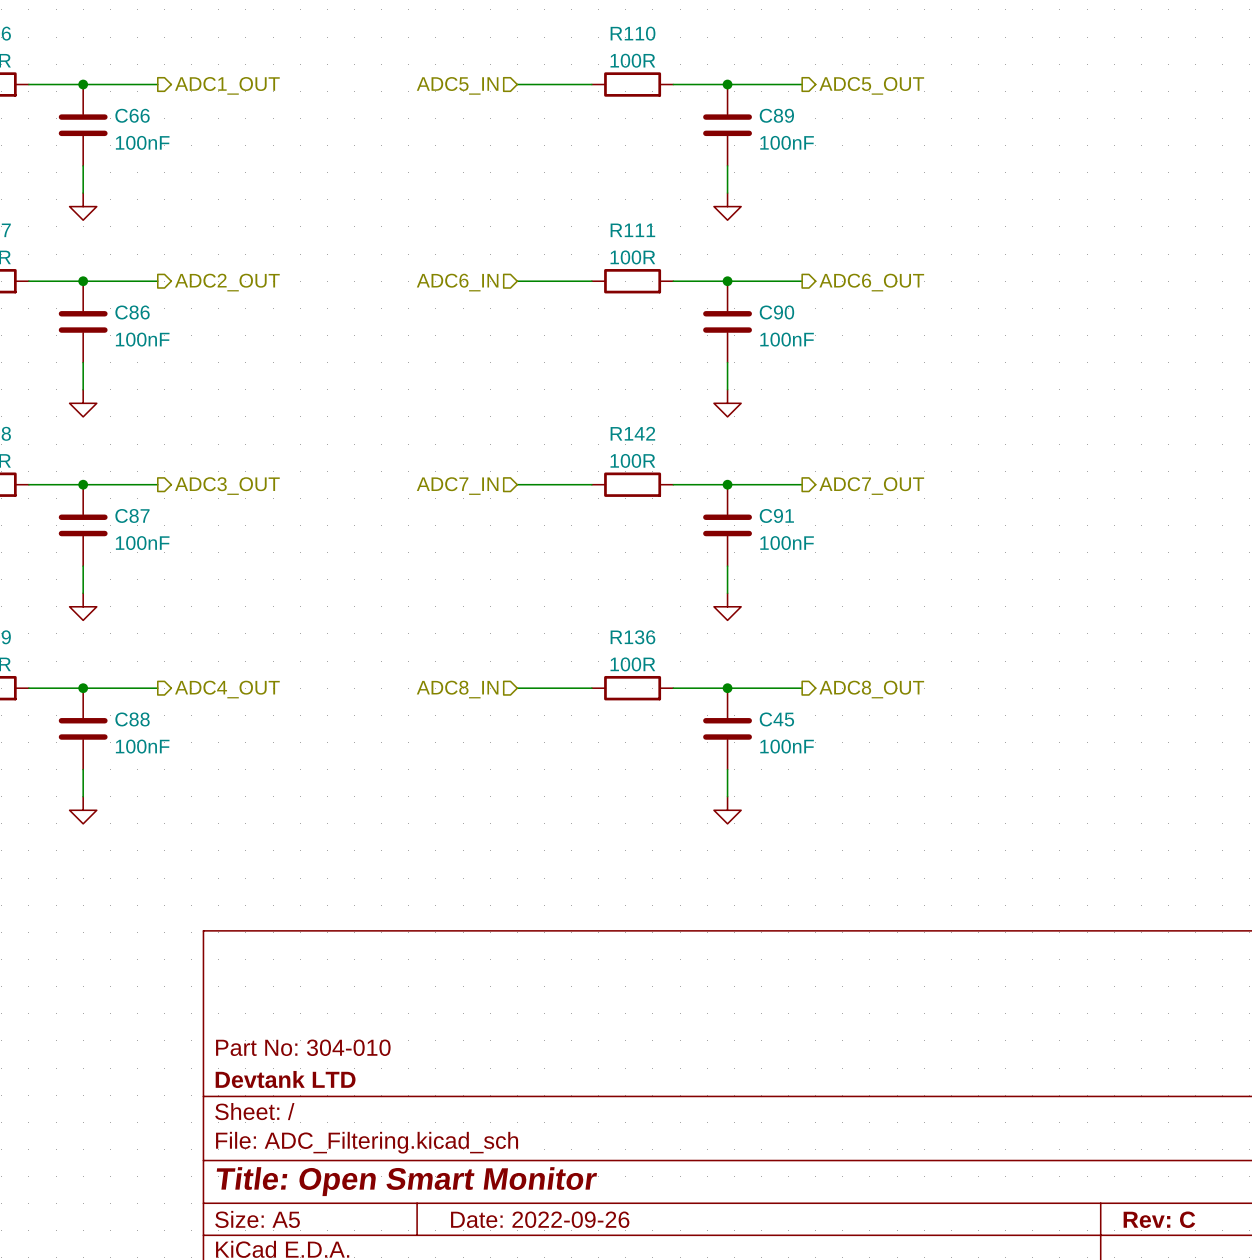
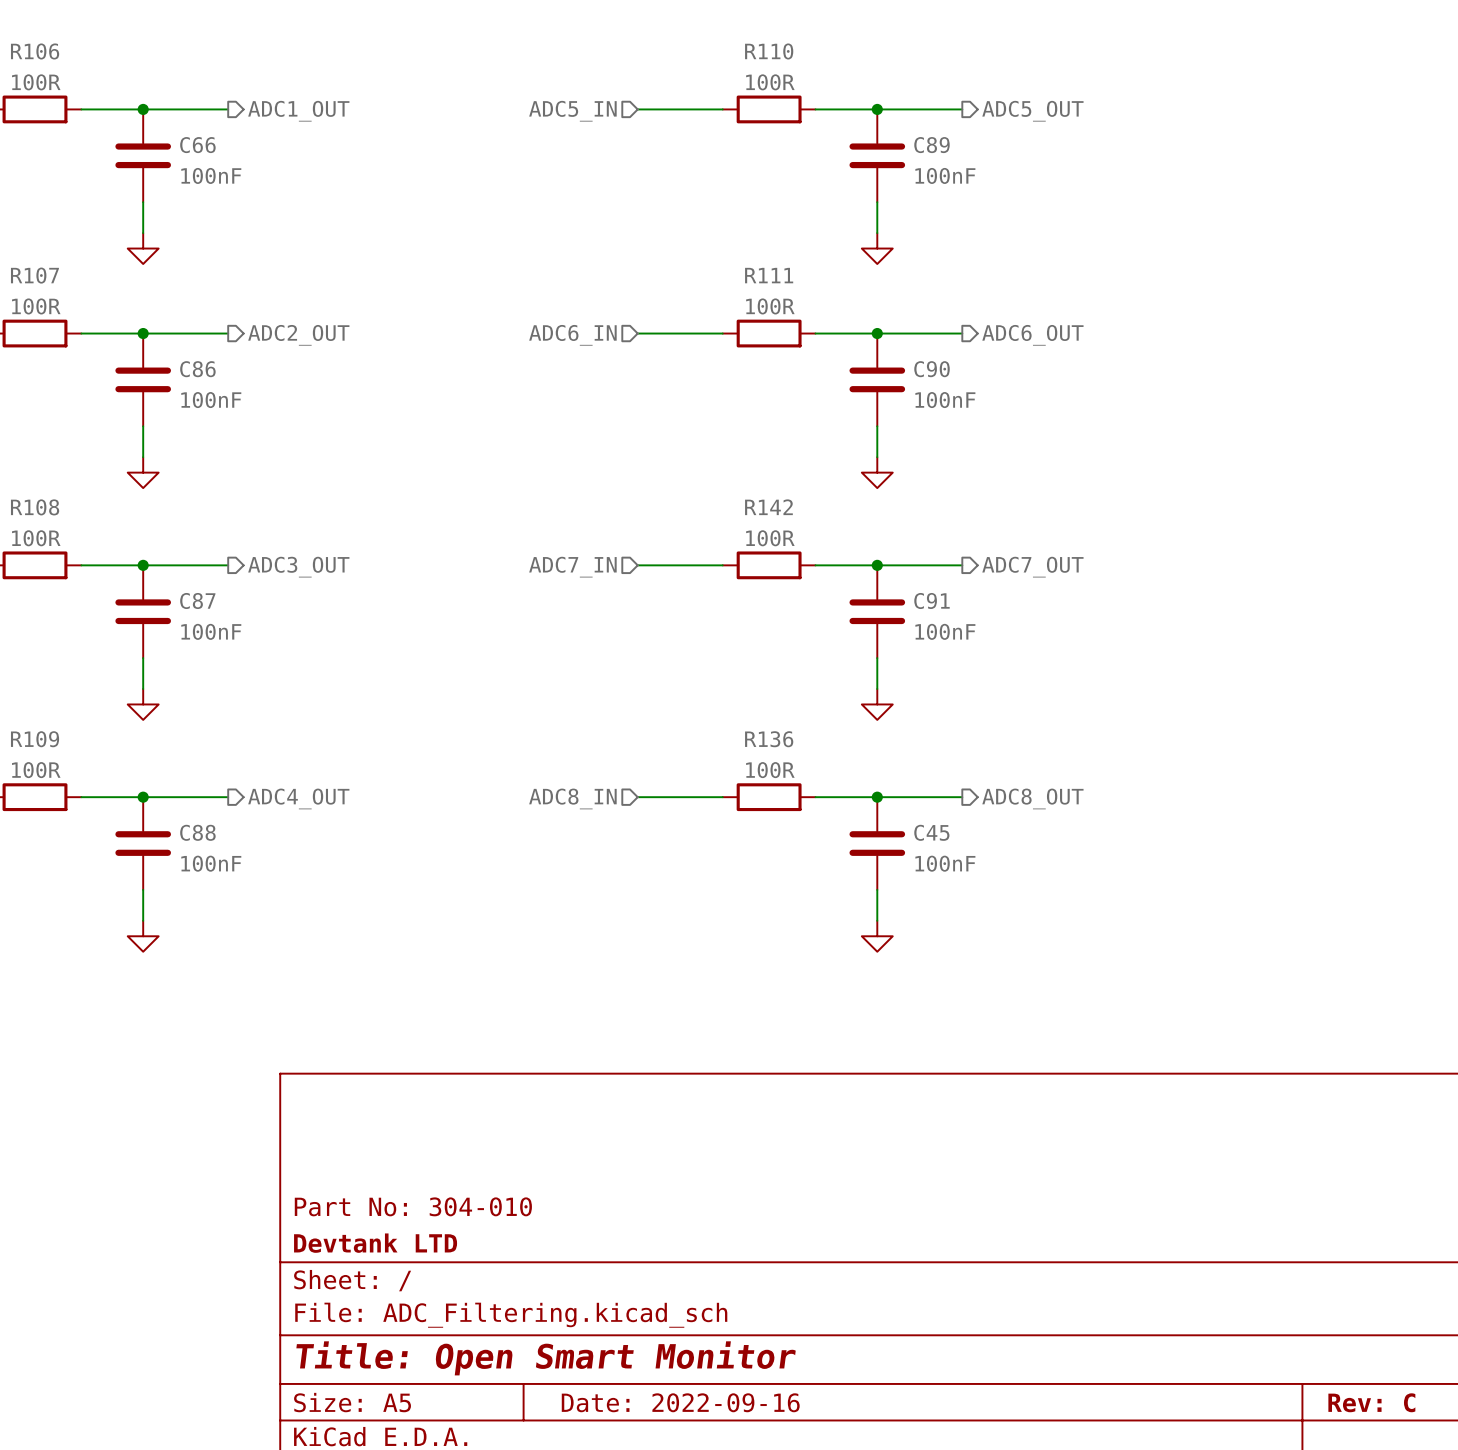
title block: Date: 2022-09-26 (540, 1219) -> Date: 2022-09-16 (680, 1402)

